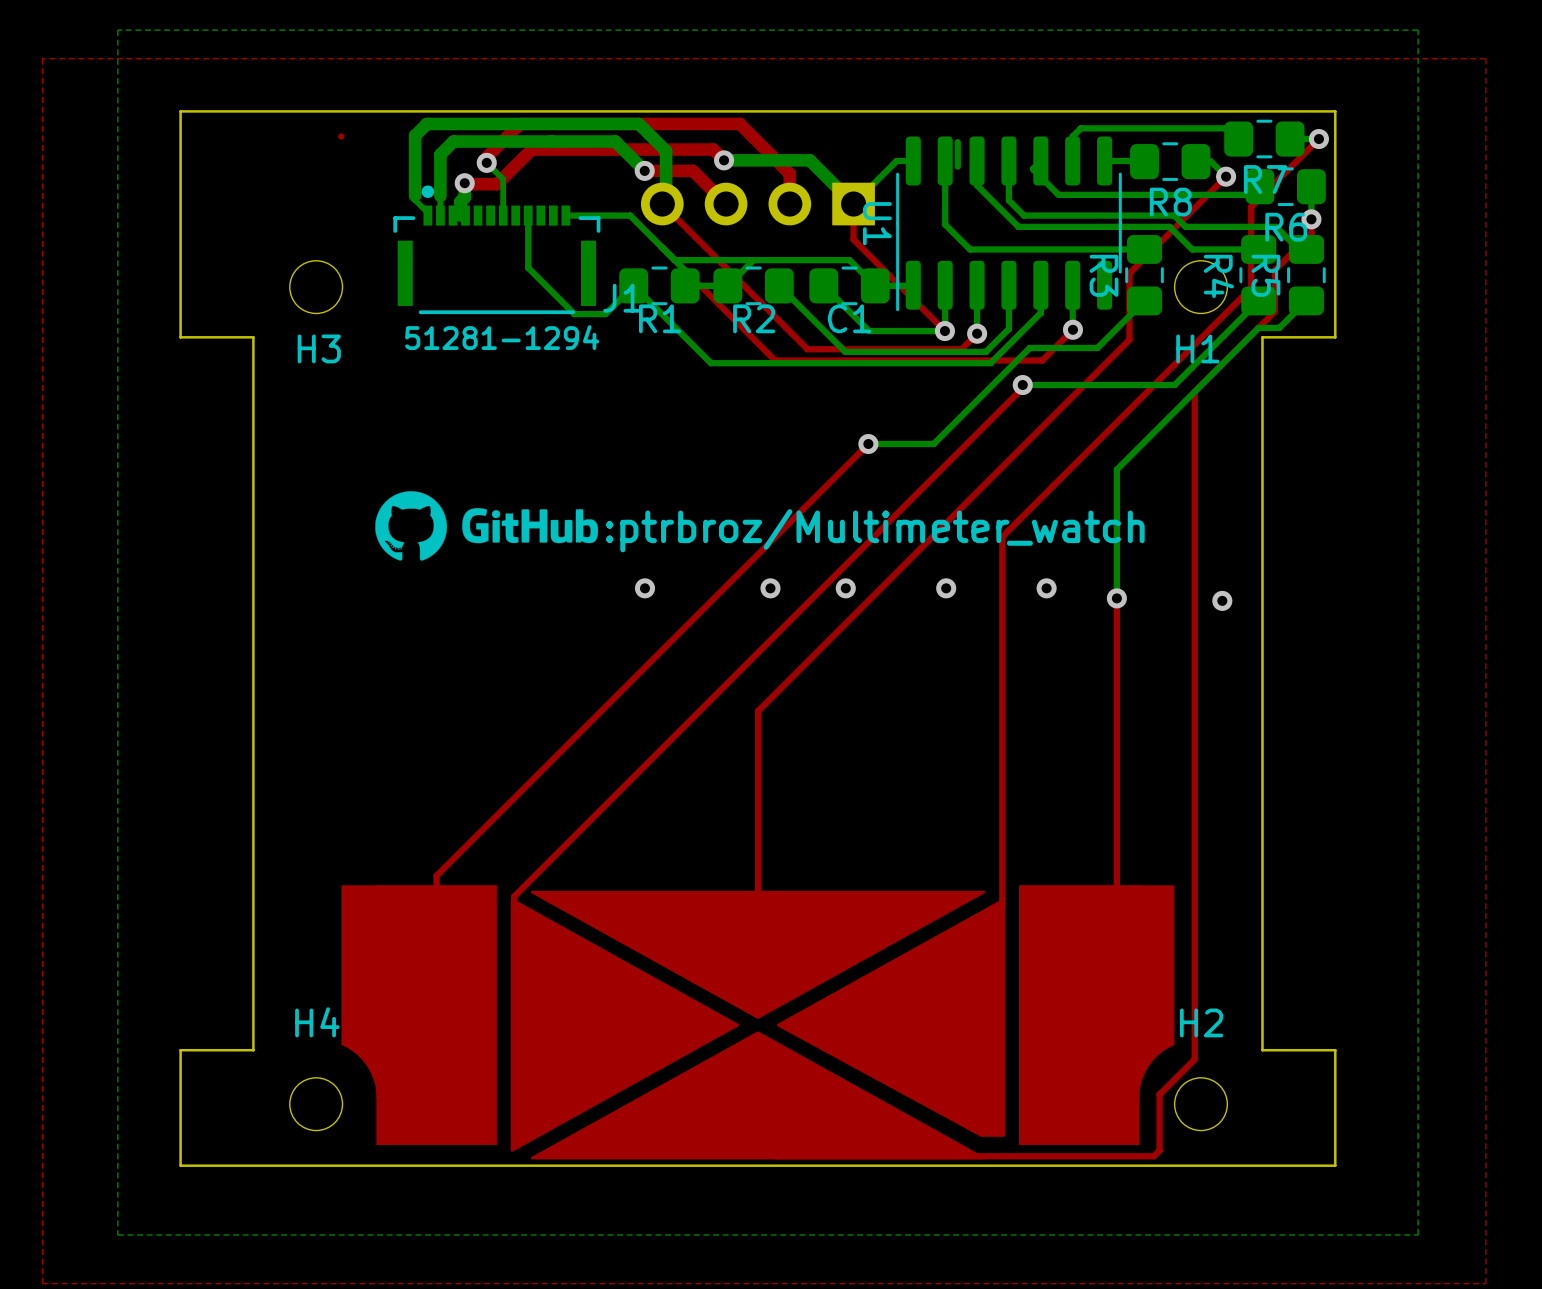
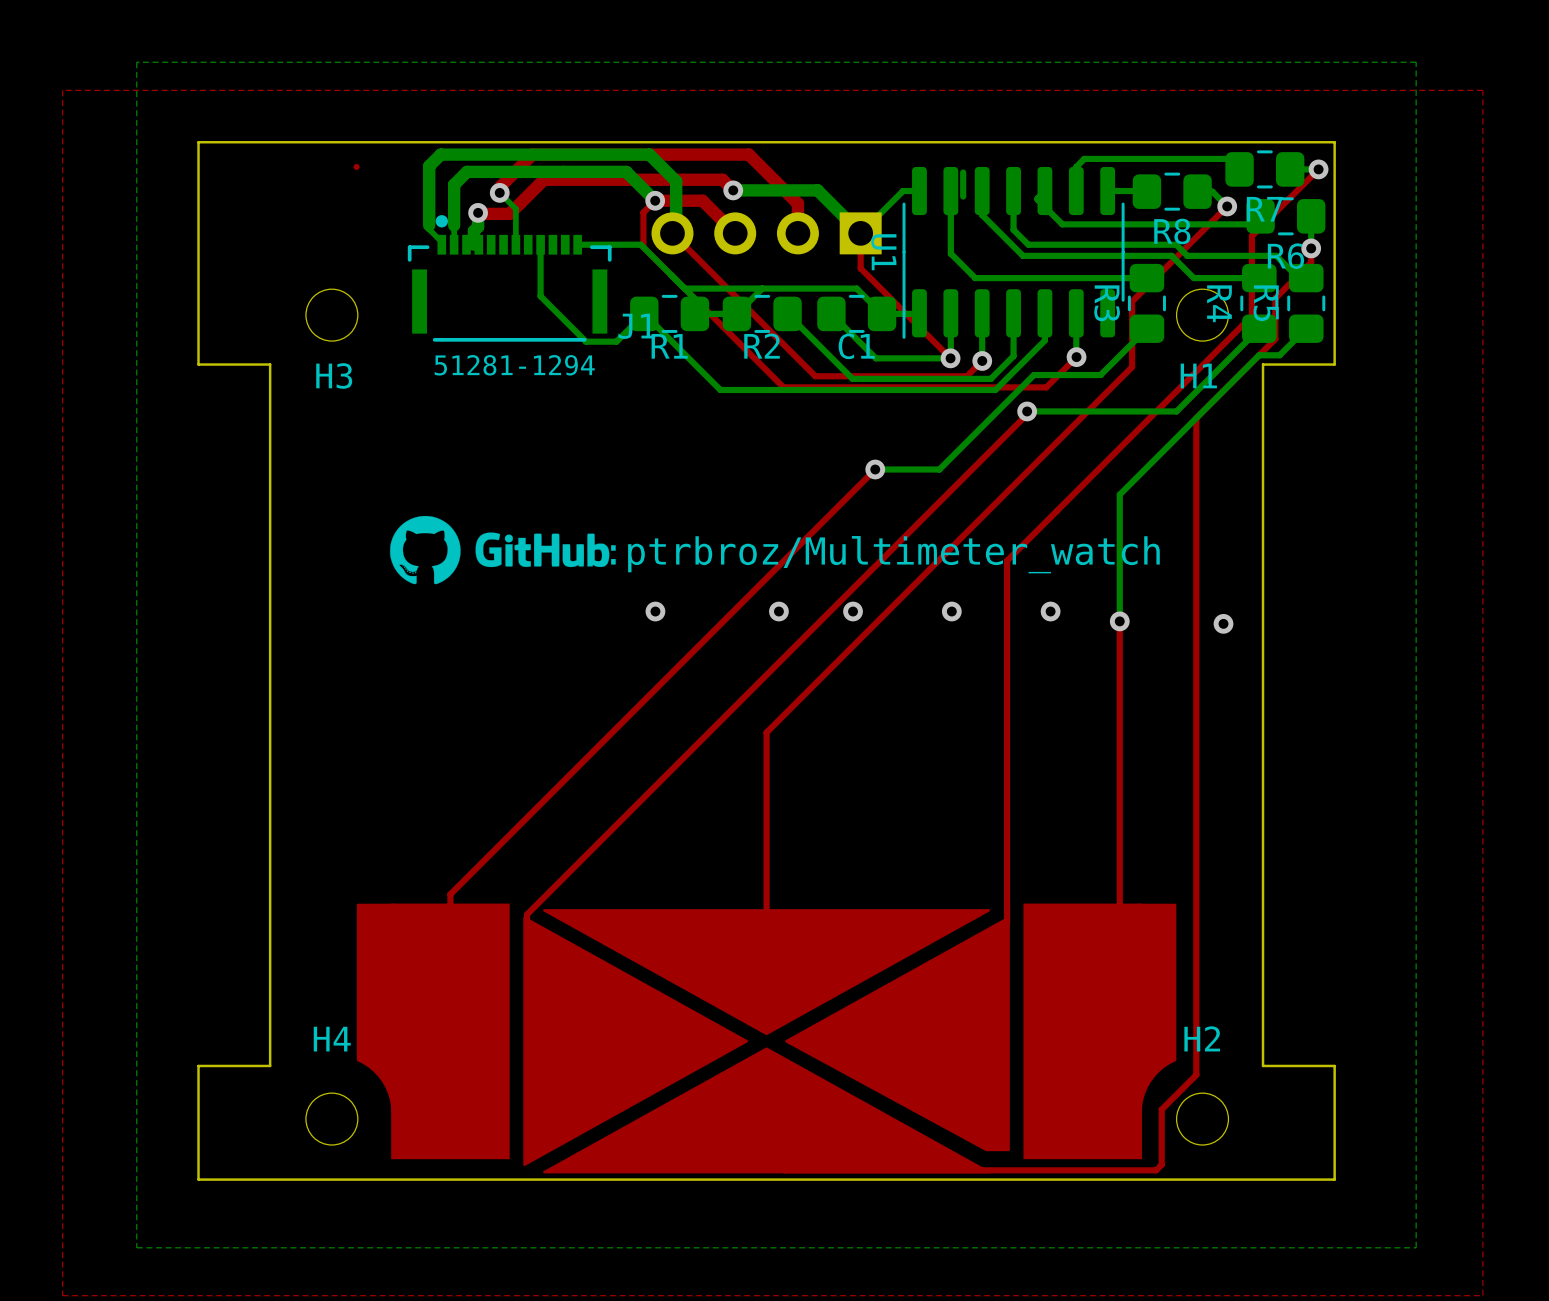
top track: none -> (655, 200) (643, 212) (643, 247)

